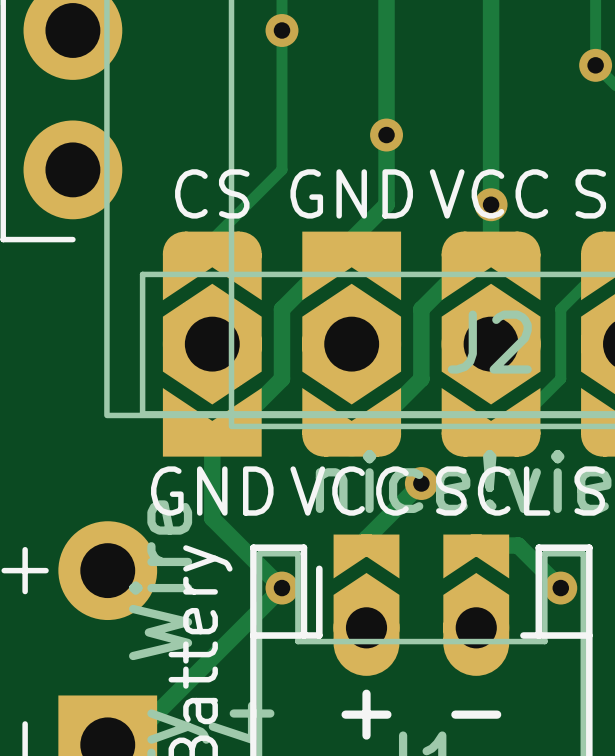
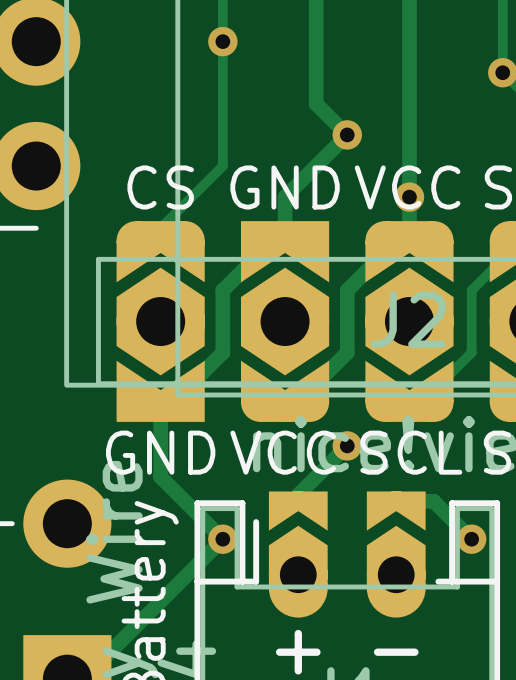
track: (386, 100) (386, 204) (351, 239) -> (316, 103) (347, 134) (285, 197) (285, 228)
via position: (386, 135) -> (347, 134)

